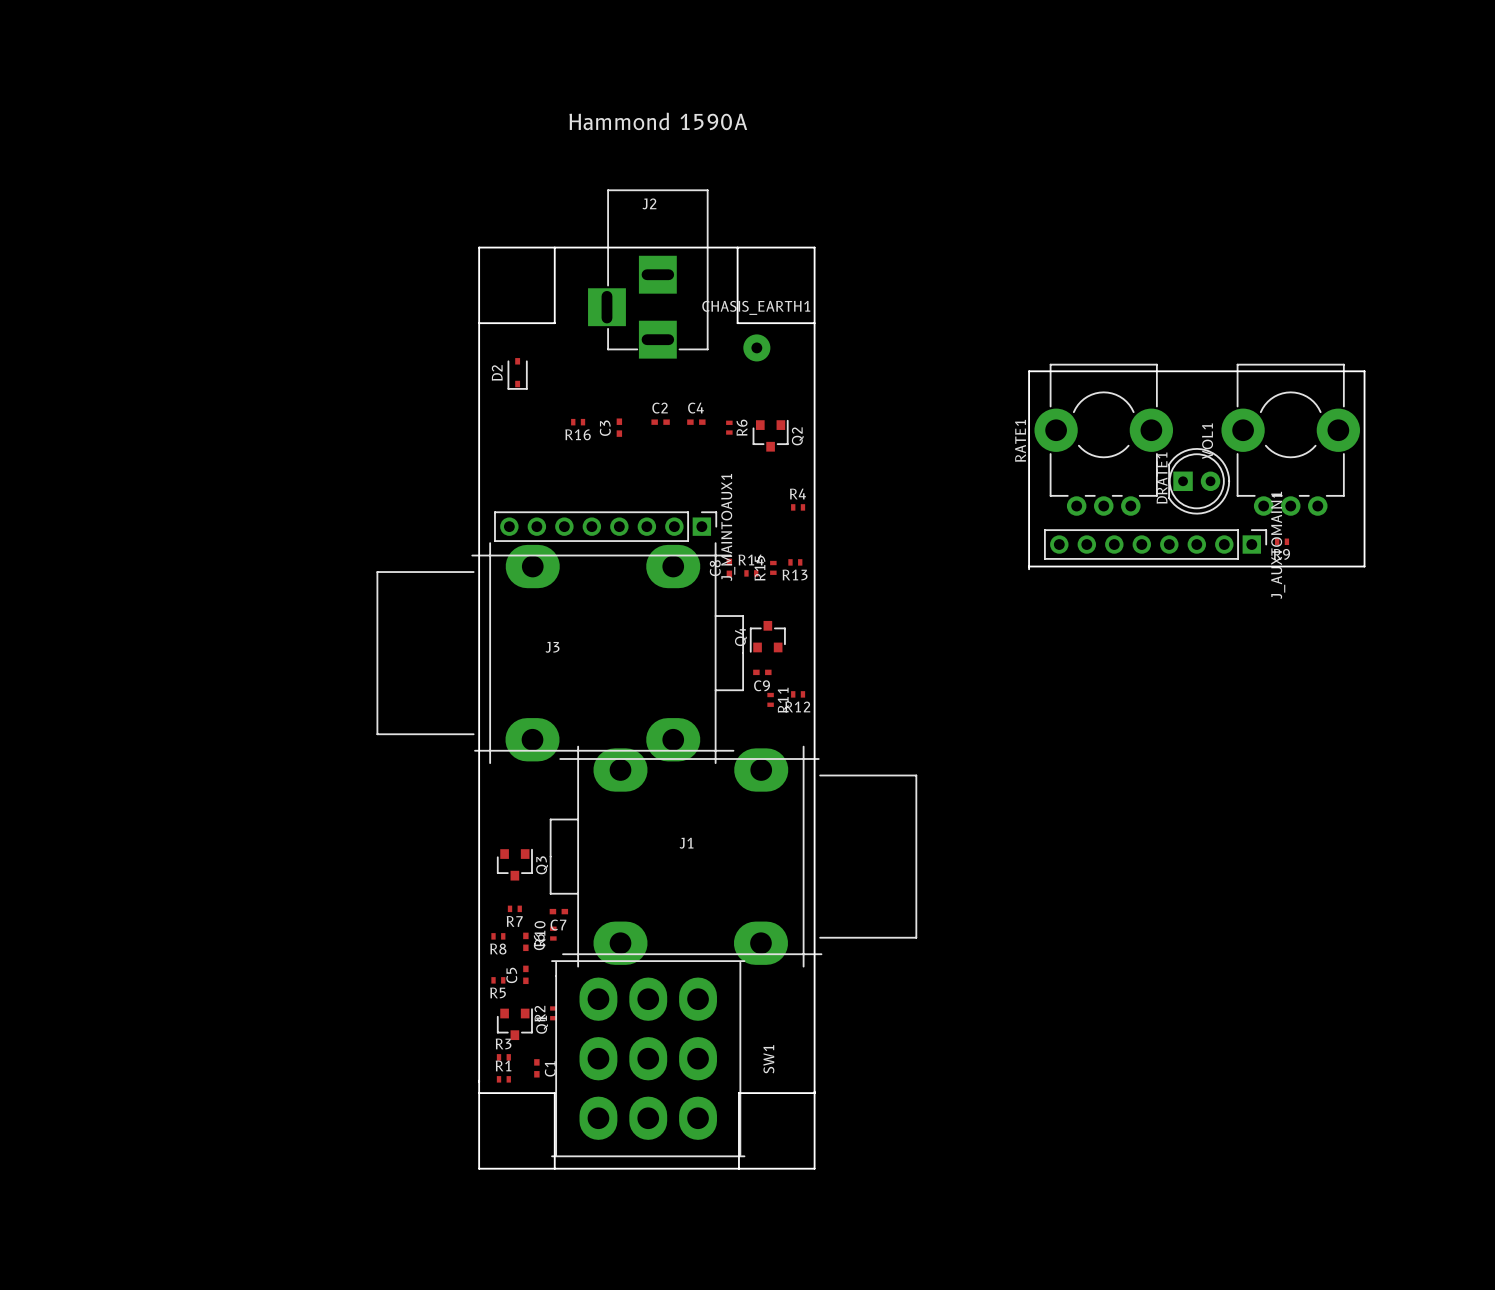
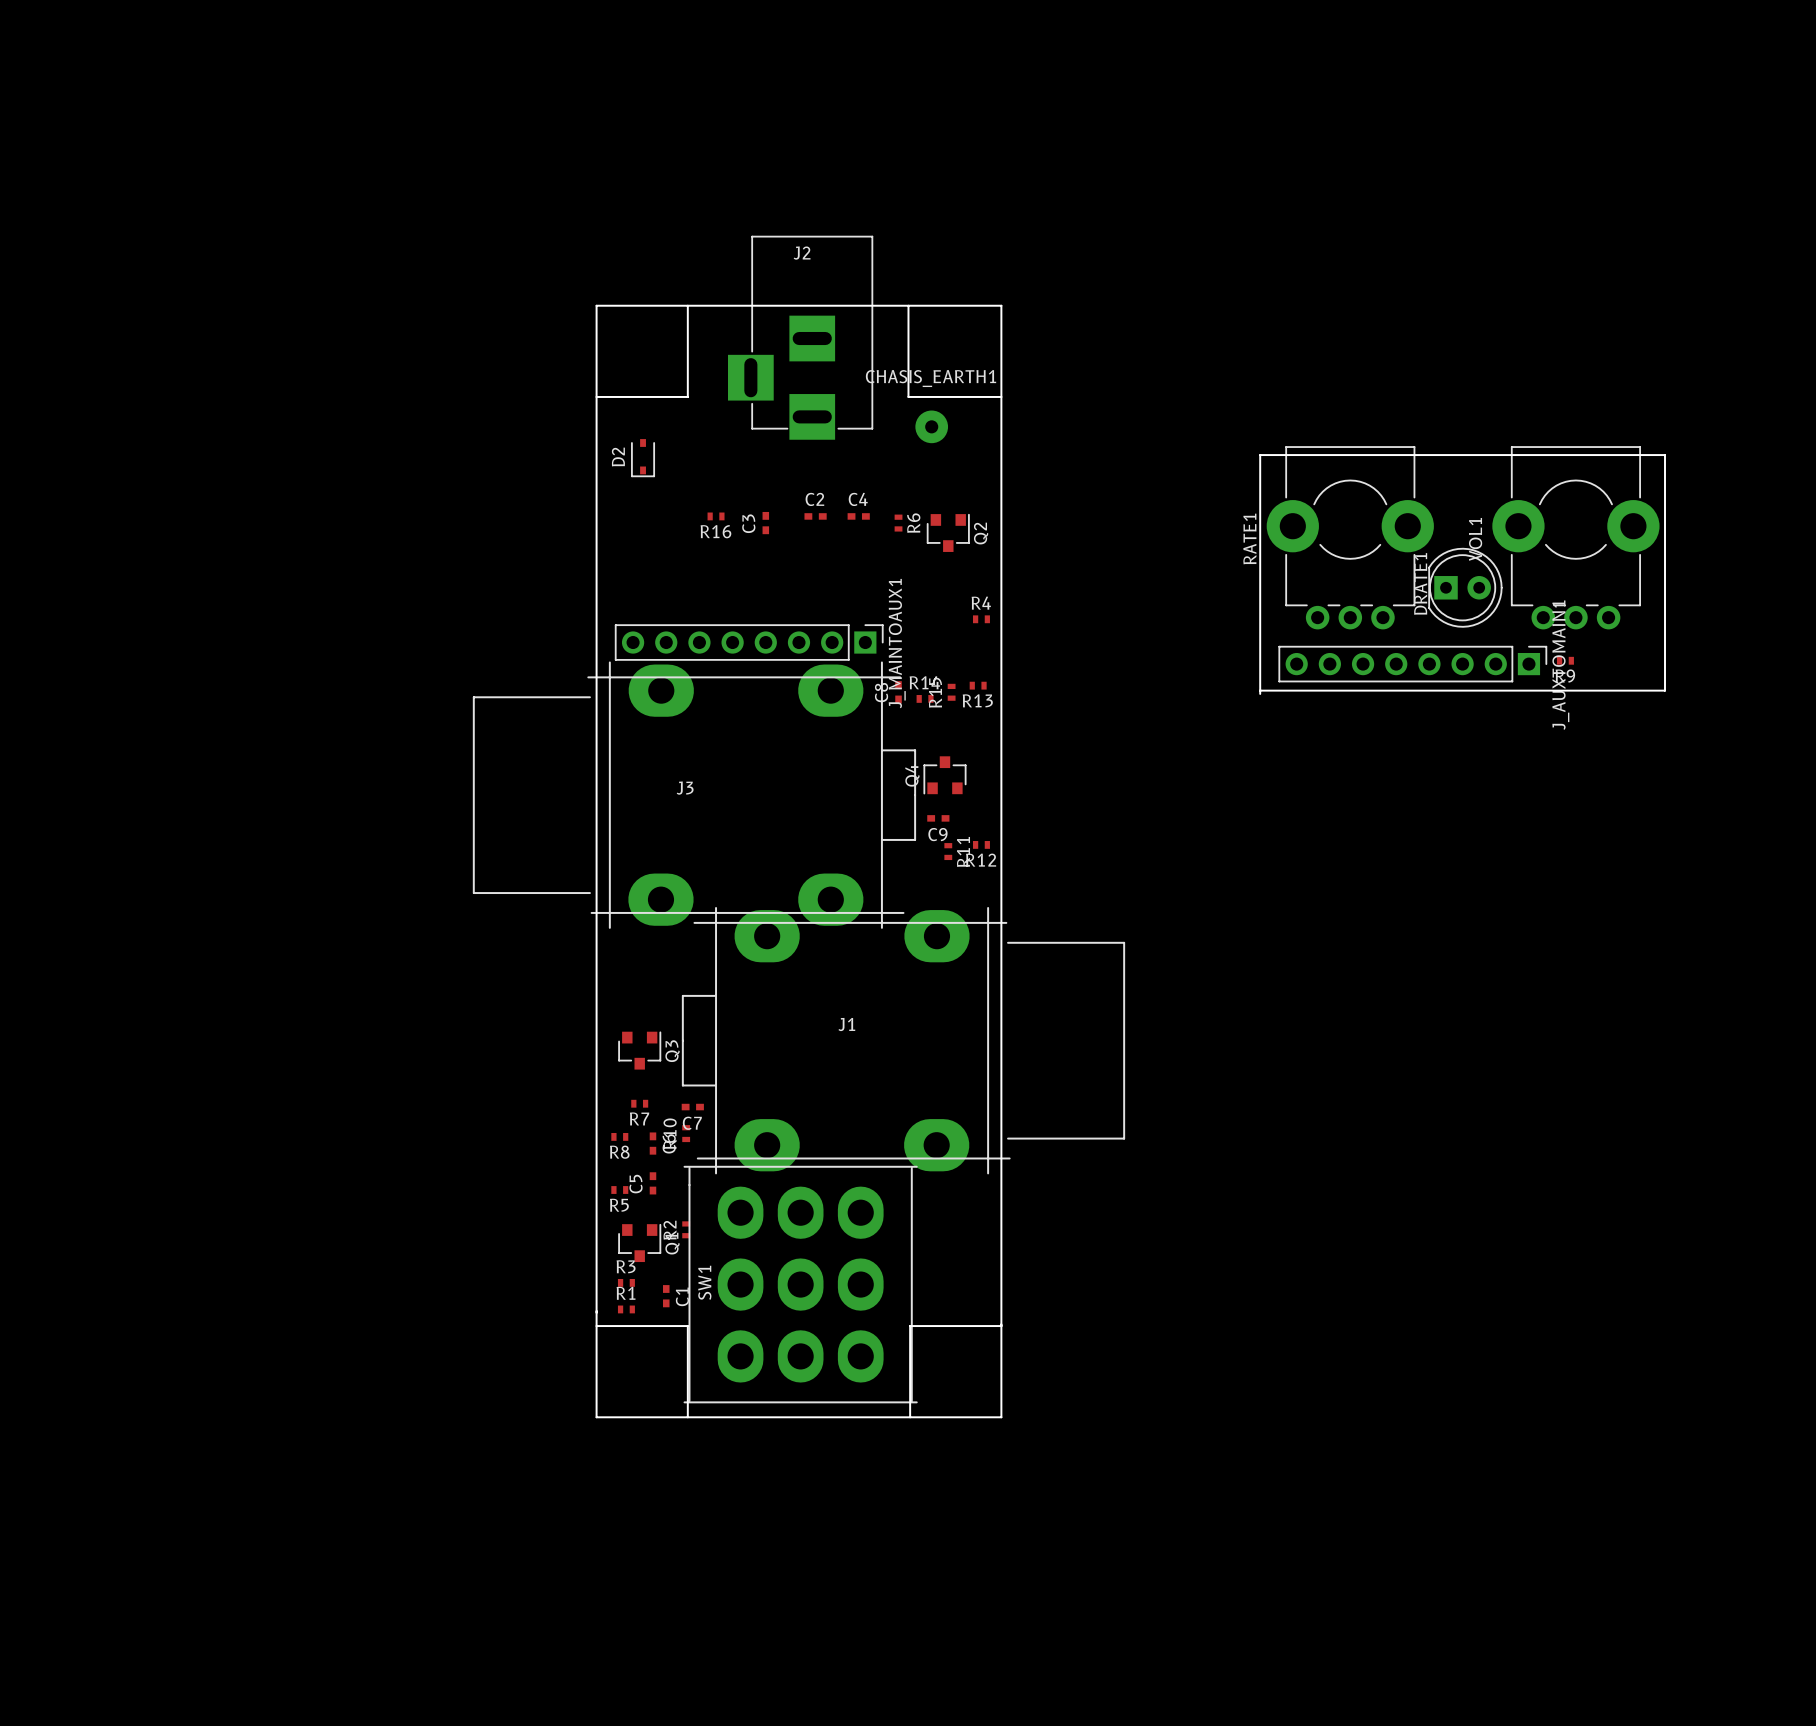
text: Hammond 1590A (658, 121) -> none
SW1 name position: SW1 (768, 1059) -> SW1 (704, 1282)

